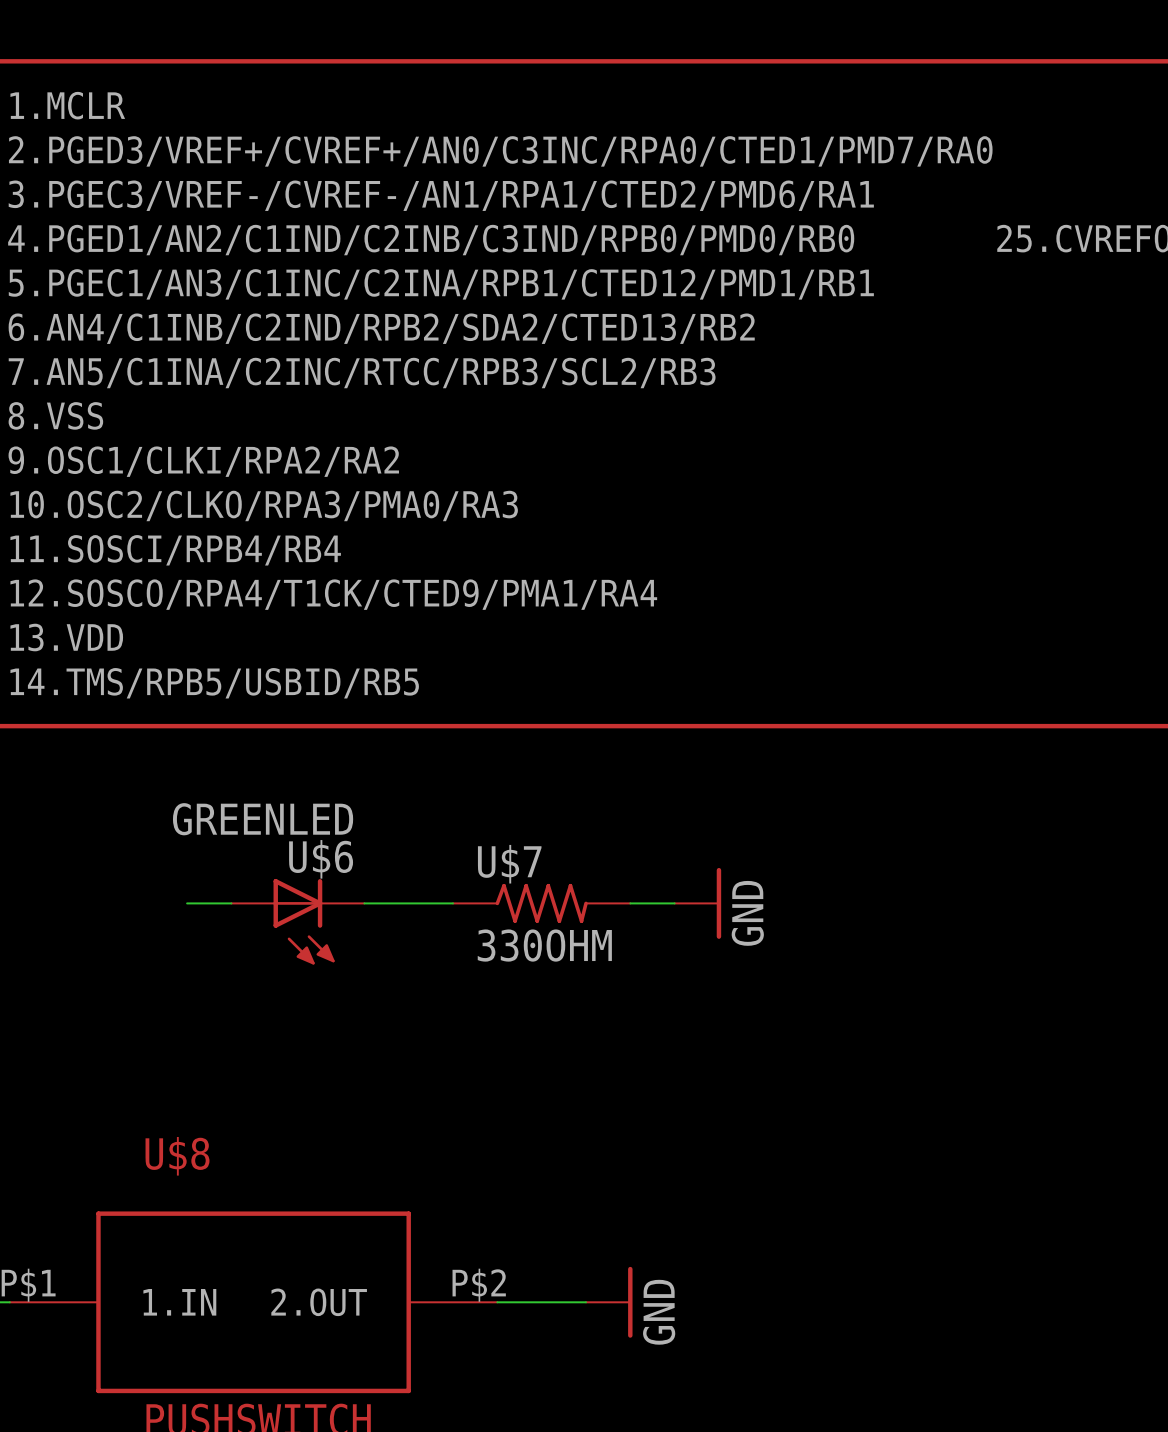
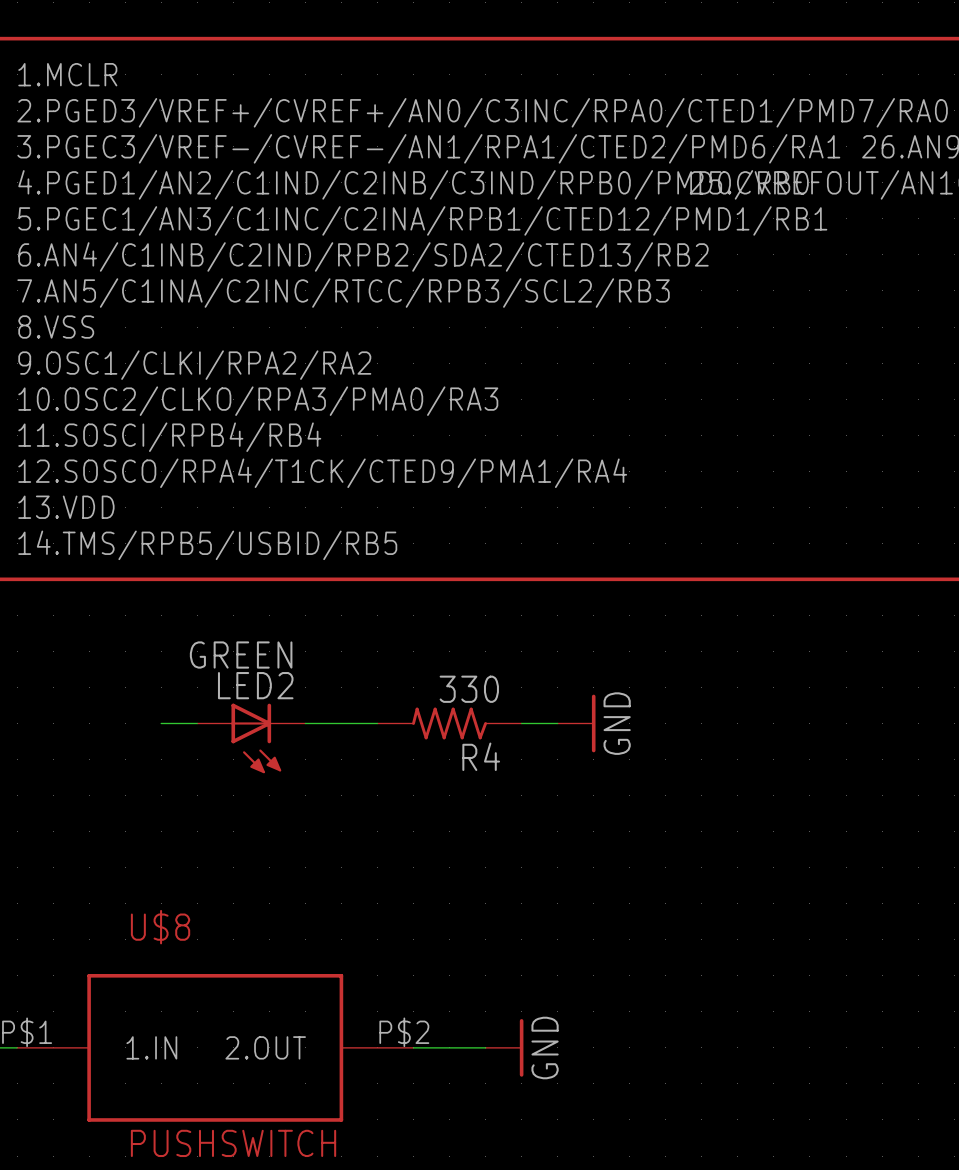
U$6 value: GREENLED (263, 819) -> GREEN (241, 655)
U$6 name: U$6 (321, 859) -> LED2 (255, 685)
U$7: 330OHM (541, 903) -> none
R4: none -> 330 (449, 723)

